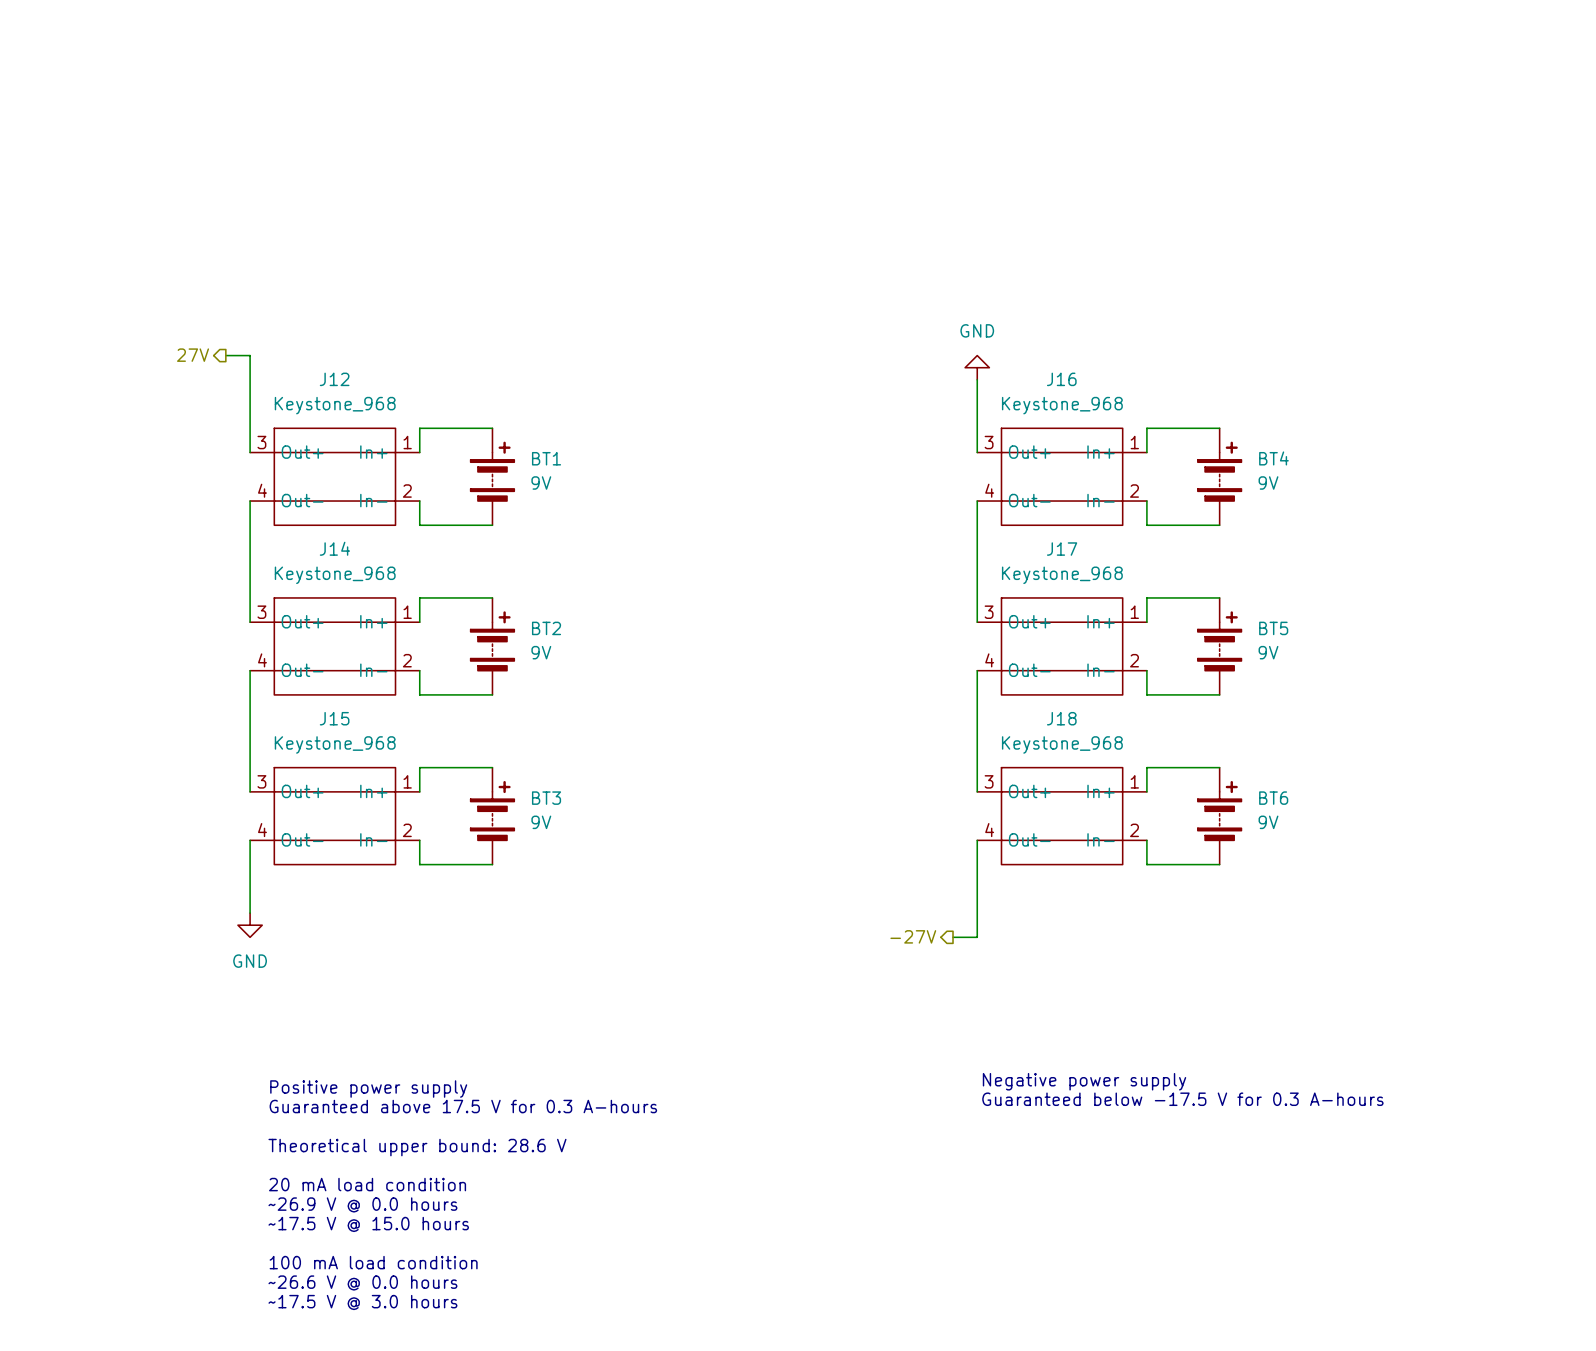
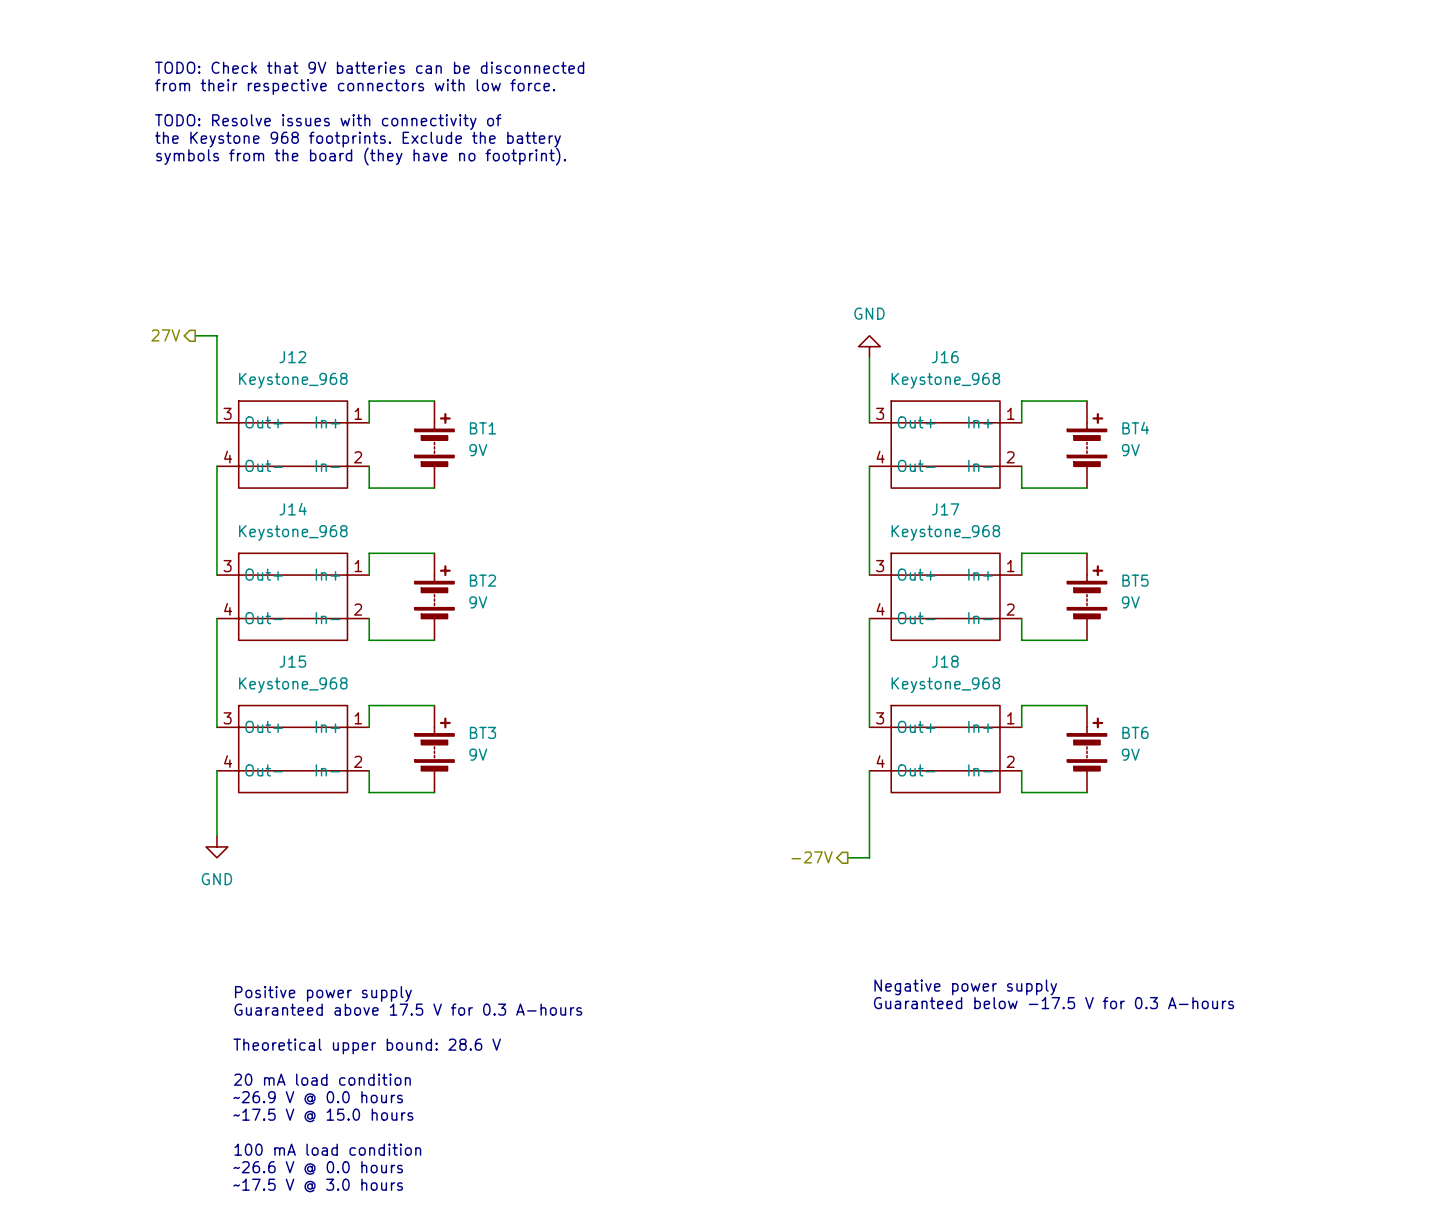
text: none -> TODO: Check that 9V batteries can be disconnected (369, 67)
text: none -> from their respective connectors with low force. (355, 87)
text: none -> TODO: Resolve issues with connectivity of (328, 122)
text: none -> the Keystone 968 footprints. Exclude the battery (358, 139)
text: none -> symbols from the board (they have no footprint). (361, 156)

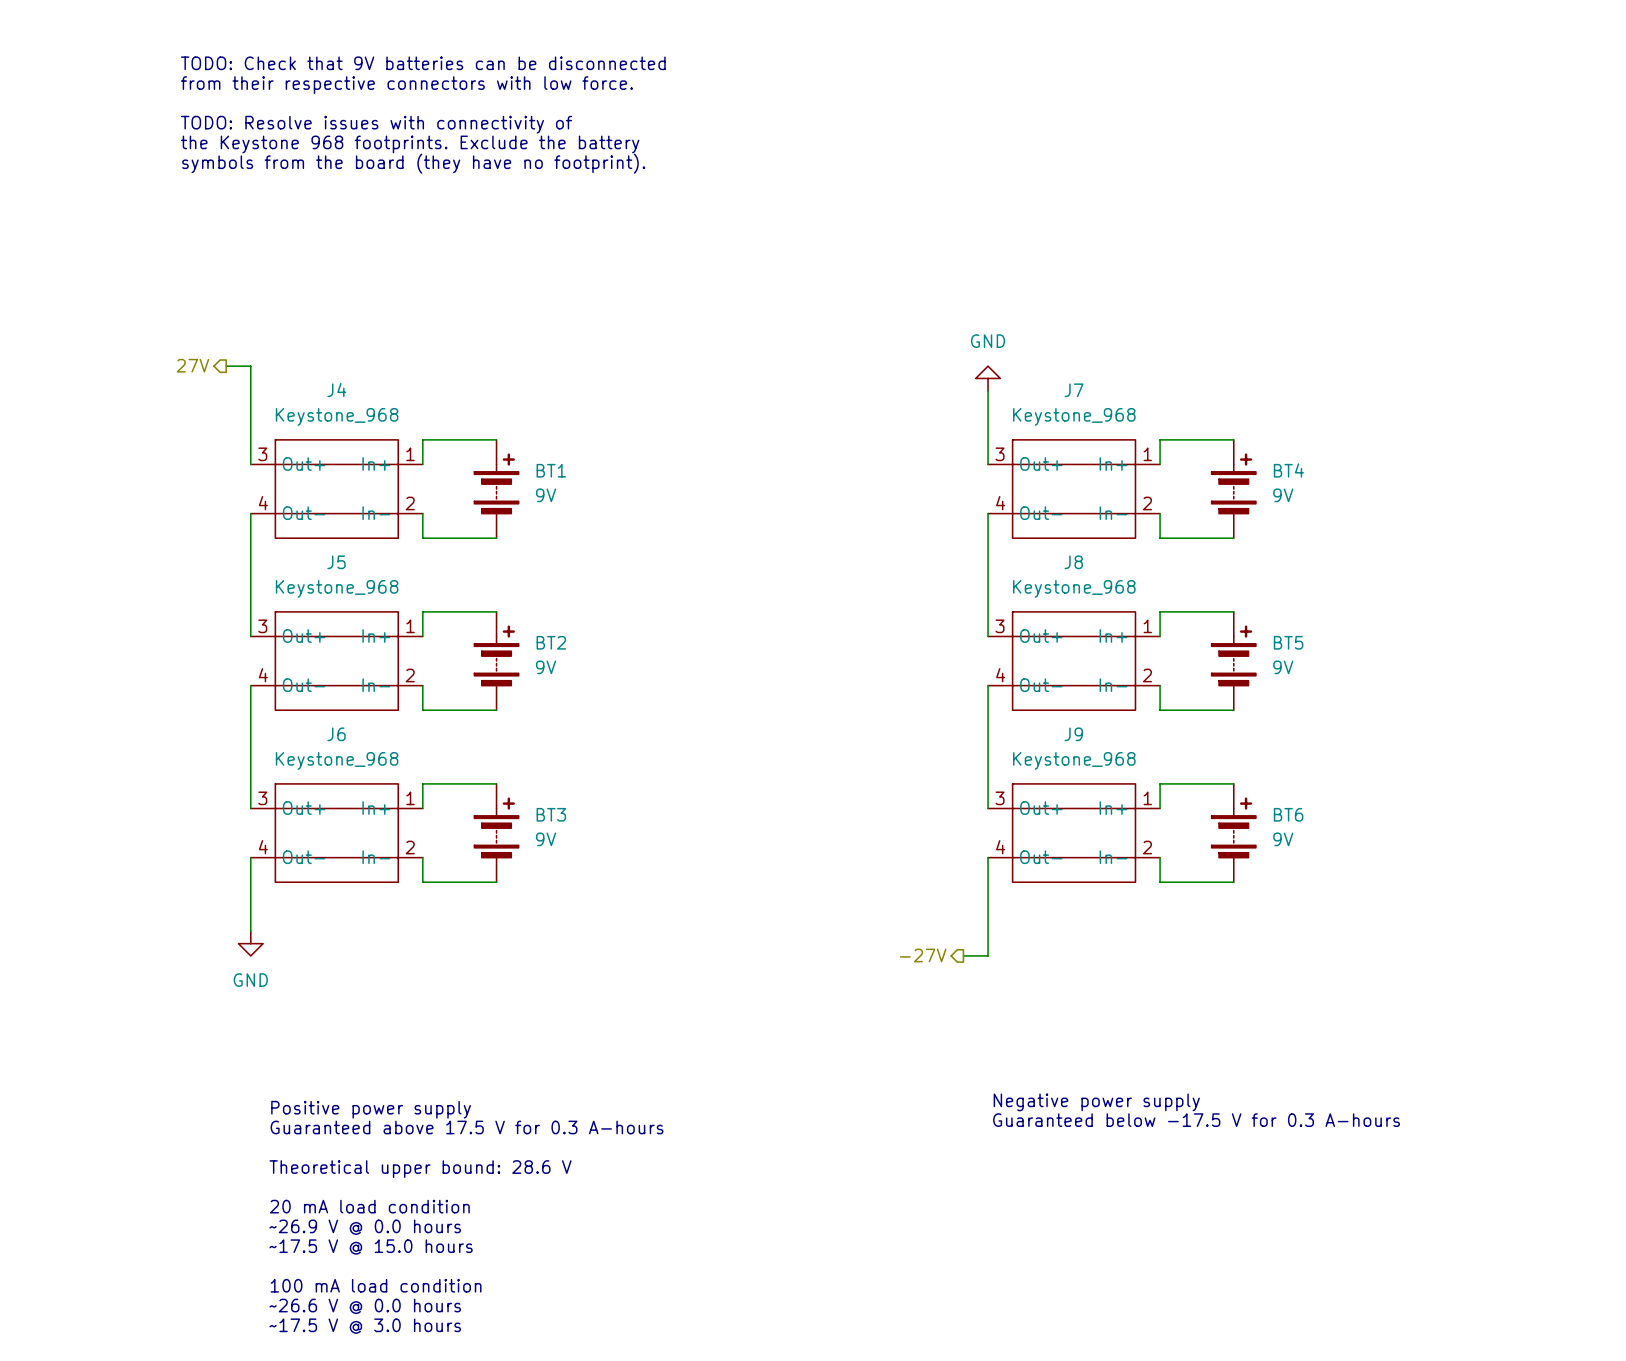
J12 name: J12 (292, 357) -> J4 (336, 389)
J16 name: J16 (945, 357) -> J7 (1074, 390)
J14 name: J14 (293, 509) -> J5 (336, 562)
J17 name: J17 (945, 509) -> J8 (1073, 562)
J15 name: J15 (292, 661) -> J6 (336, 734)
J18 name: J18 (945, 661) -> J9 (1073, 734)

